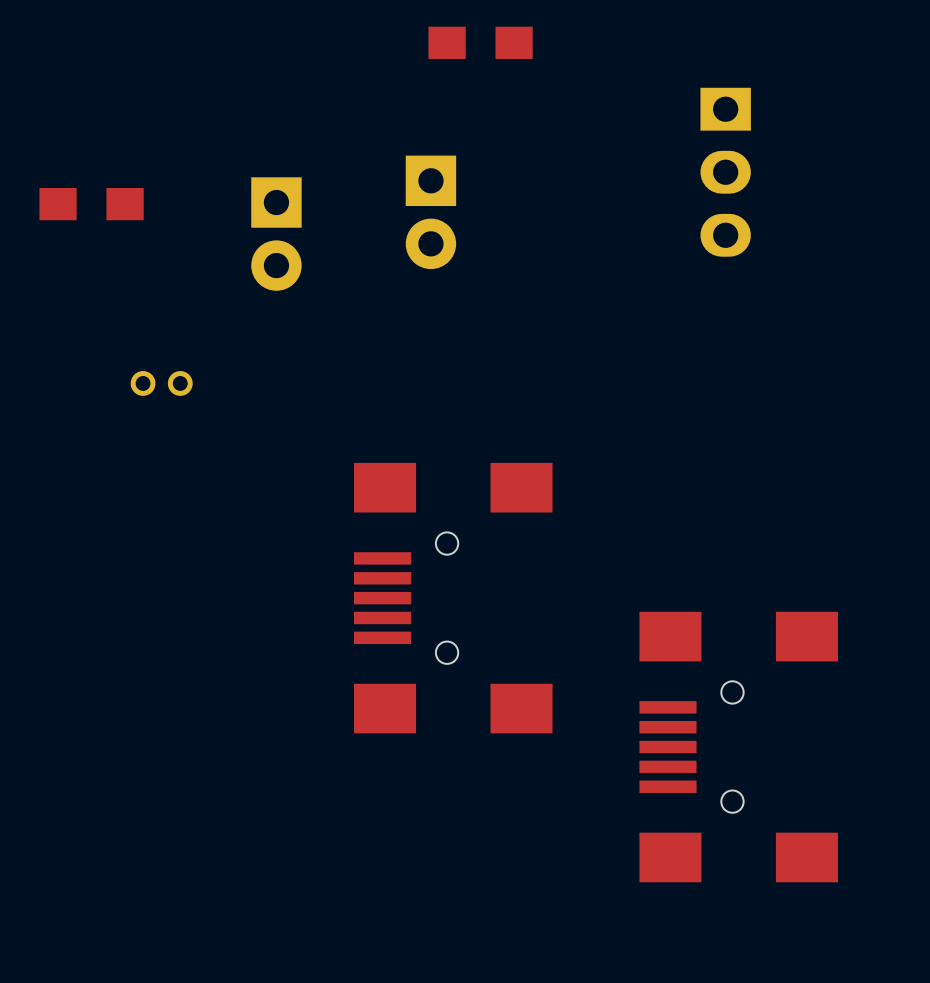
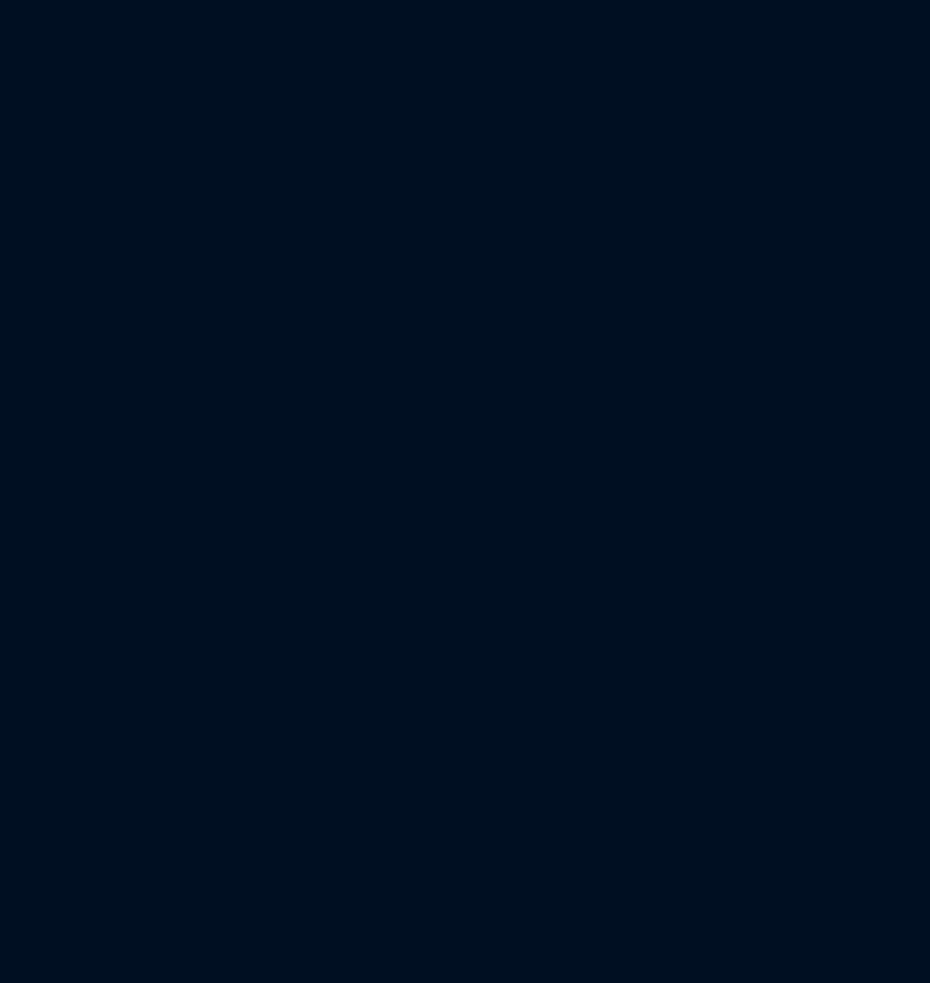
part: (480, 42) -> none
part: (725, 172) -> none
part: (91, 204) -> none
part: (430, 212) -> none
part: (276, 234) -> none
part: (161, 383) -> none
part: (453, 598) -> none
part: (738, 747) -> none

